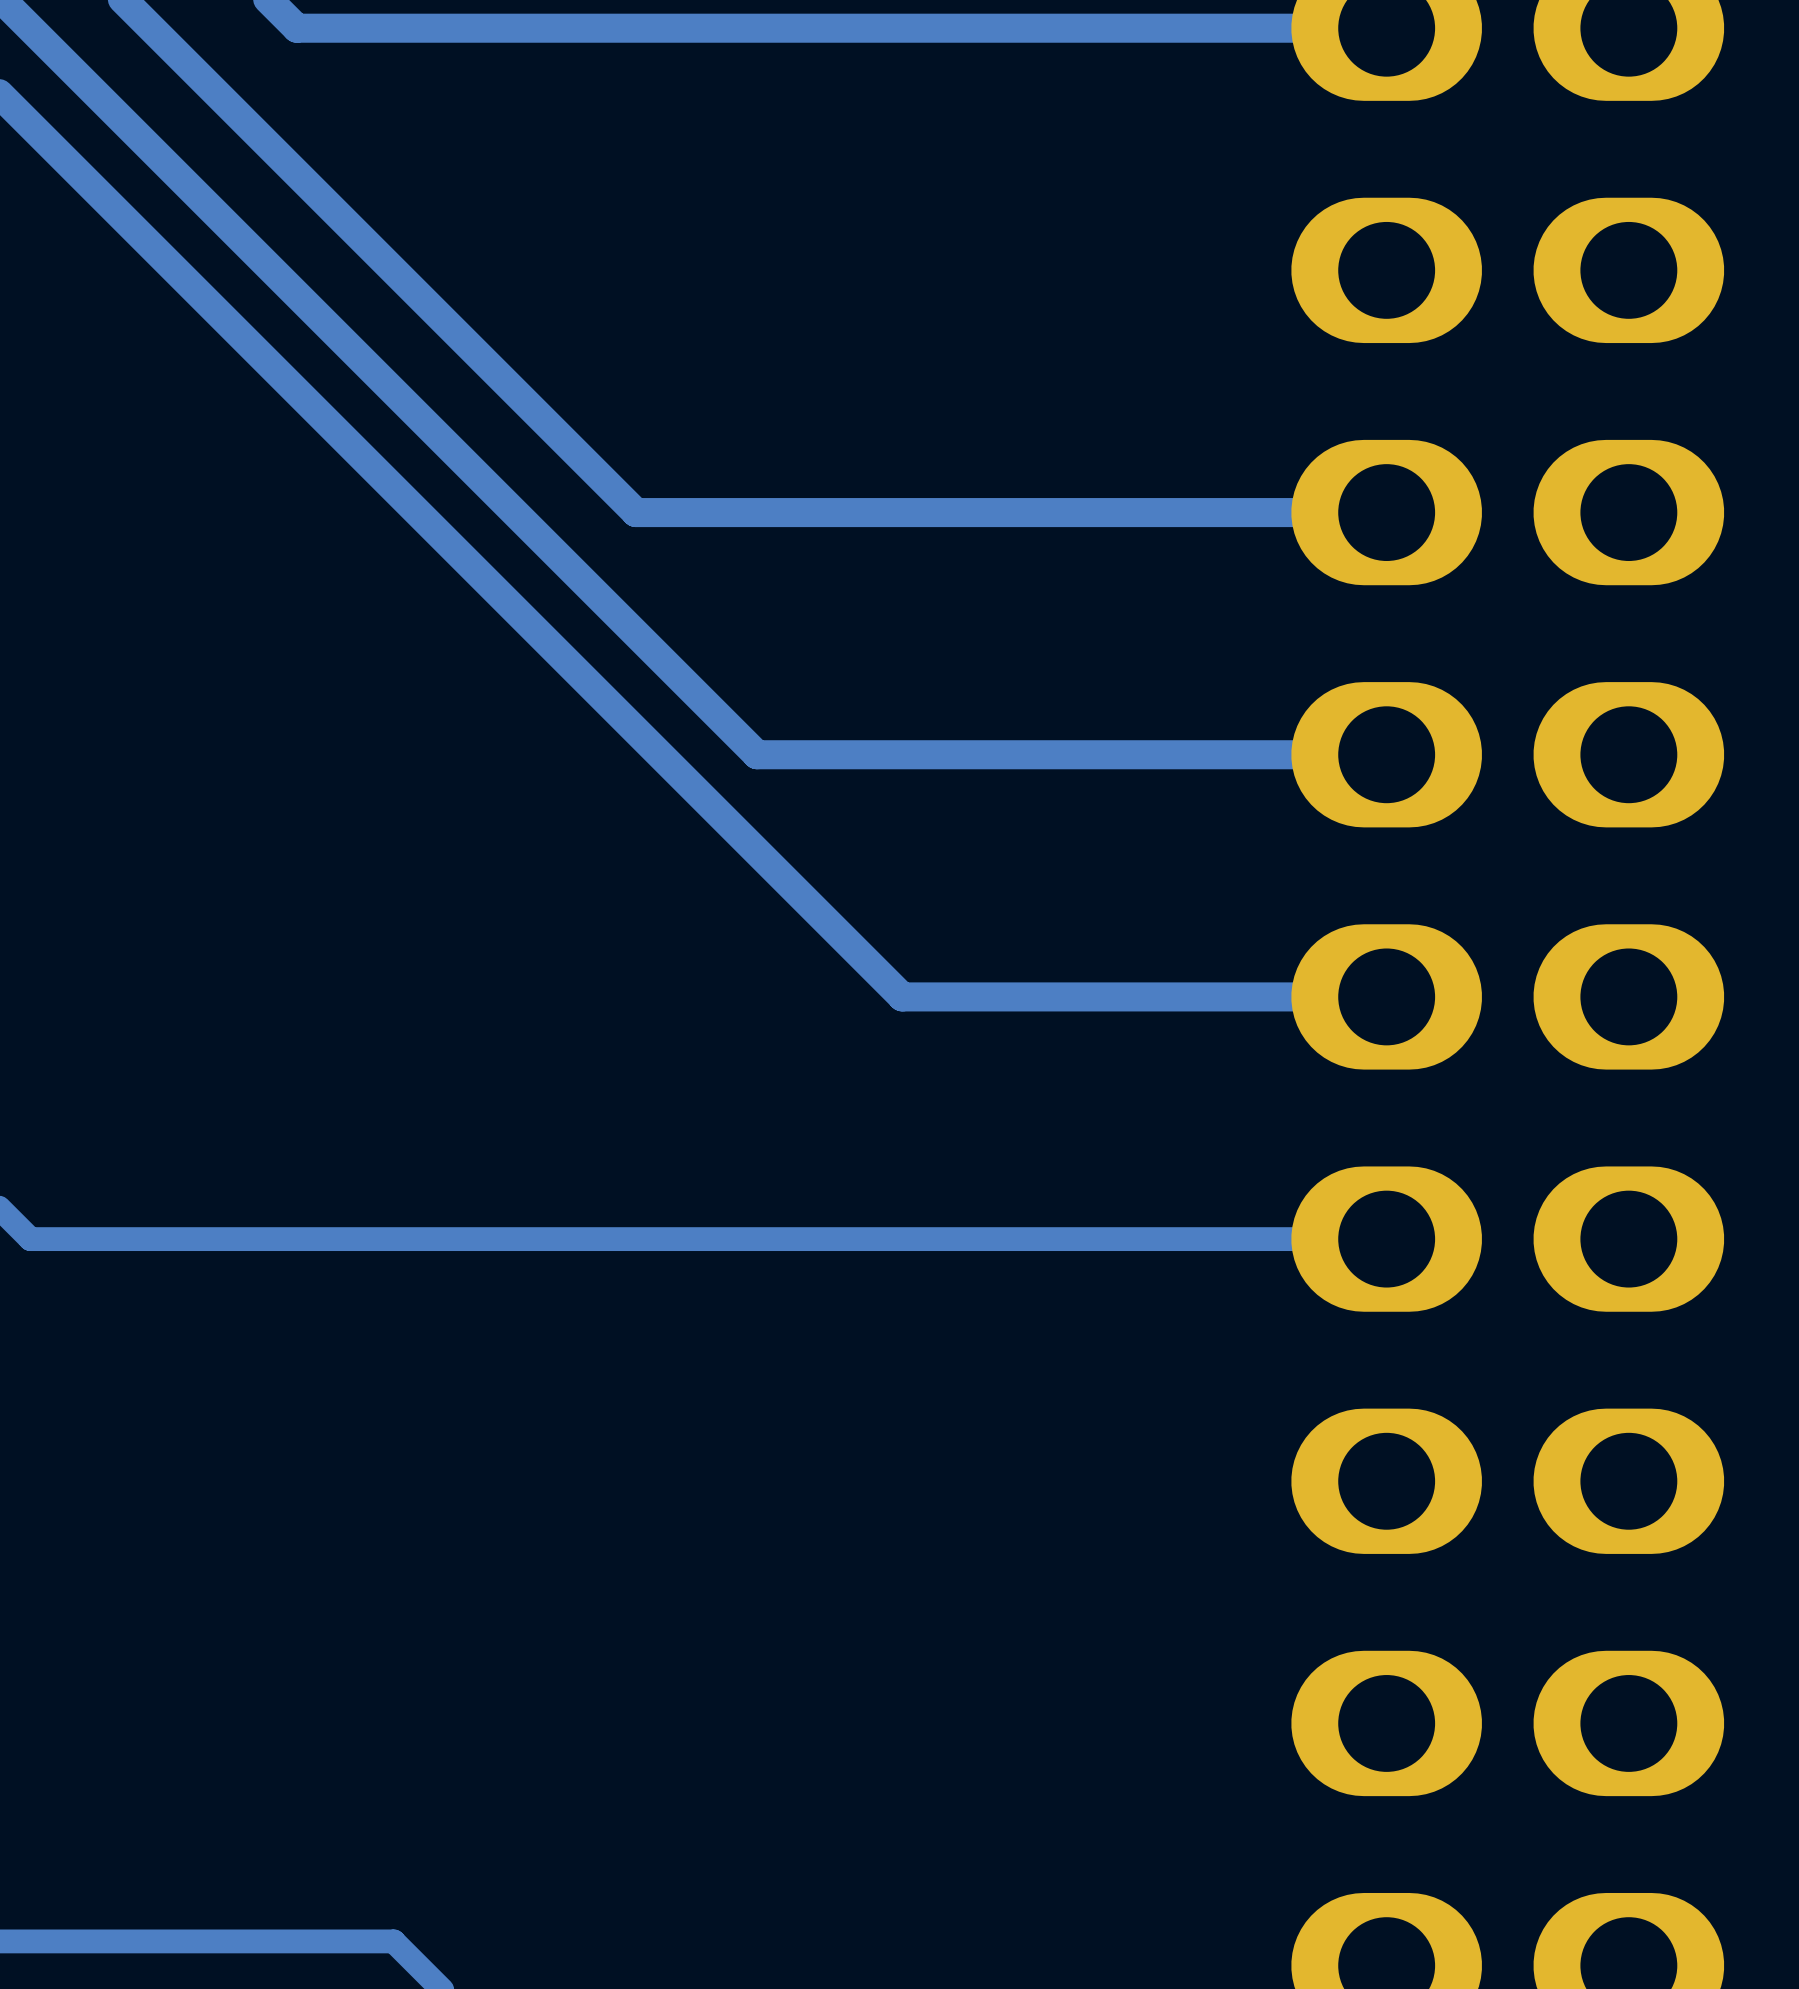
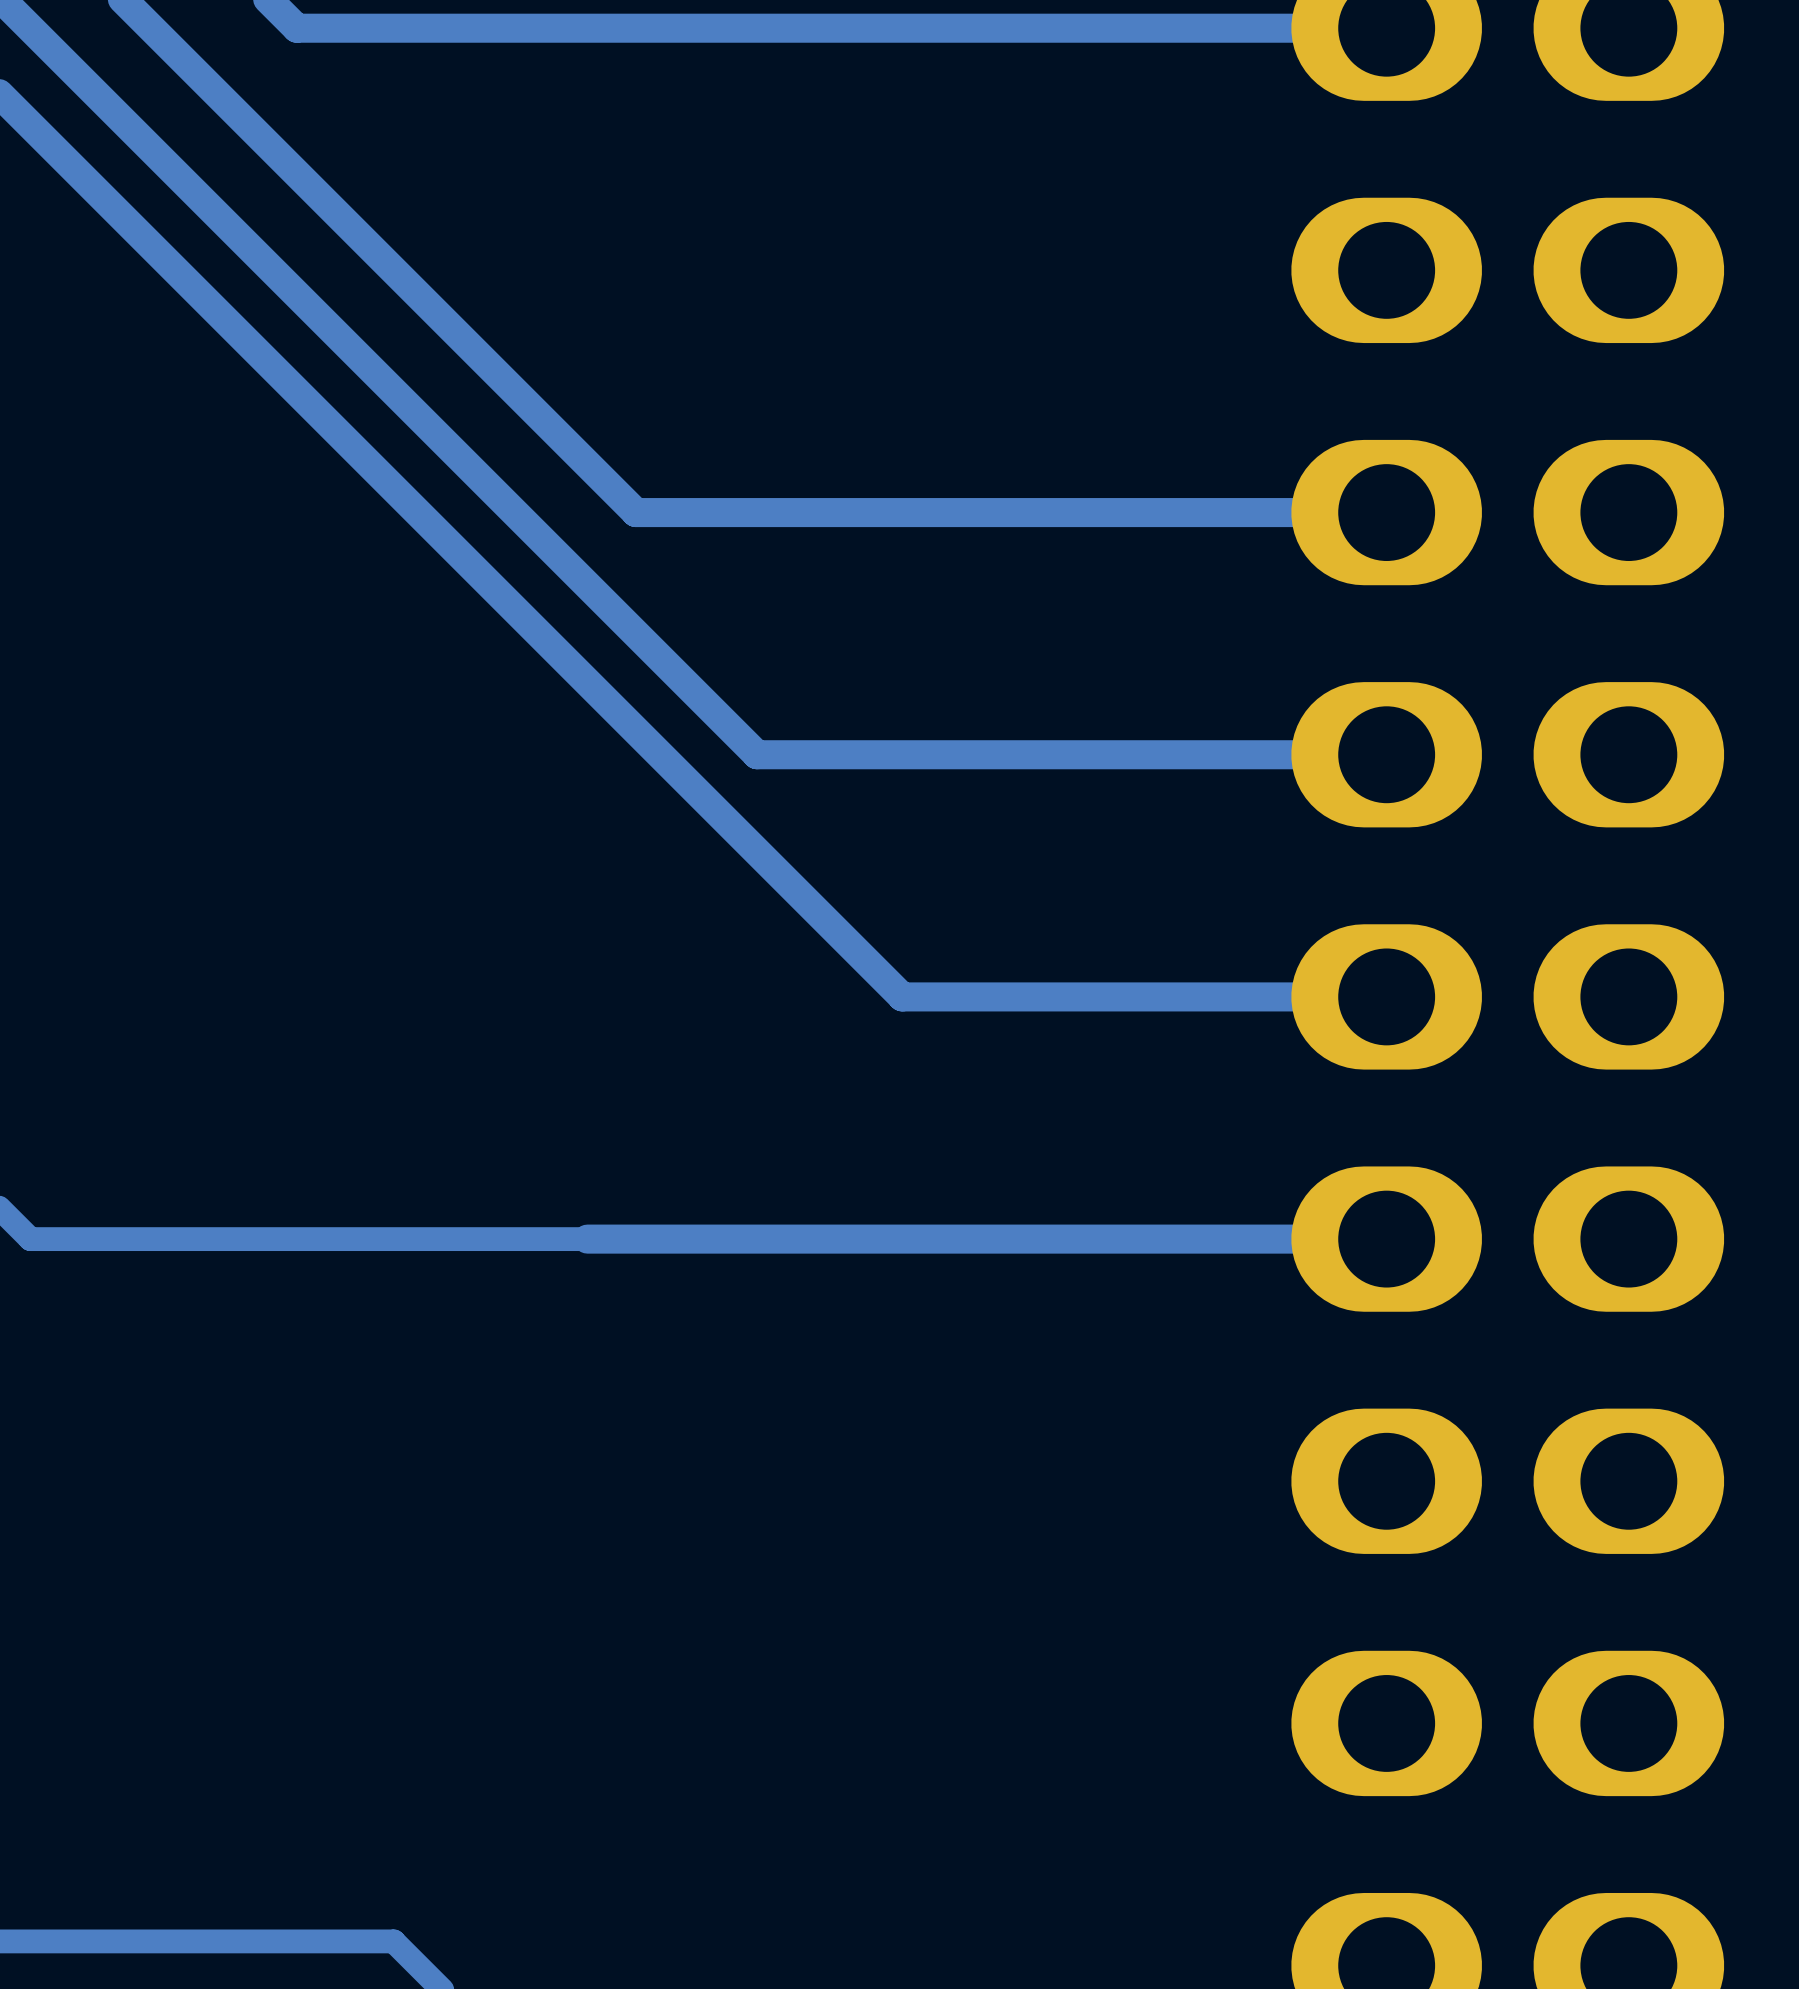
track width: thin (1386, 1239) (587, 1239) -> thick (1386, 1239) (587, 1239)

